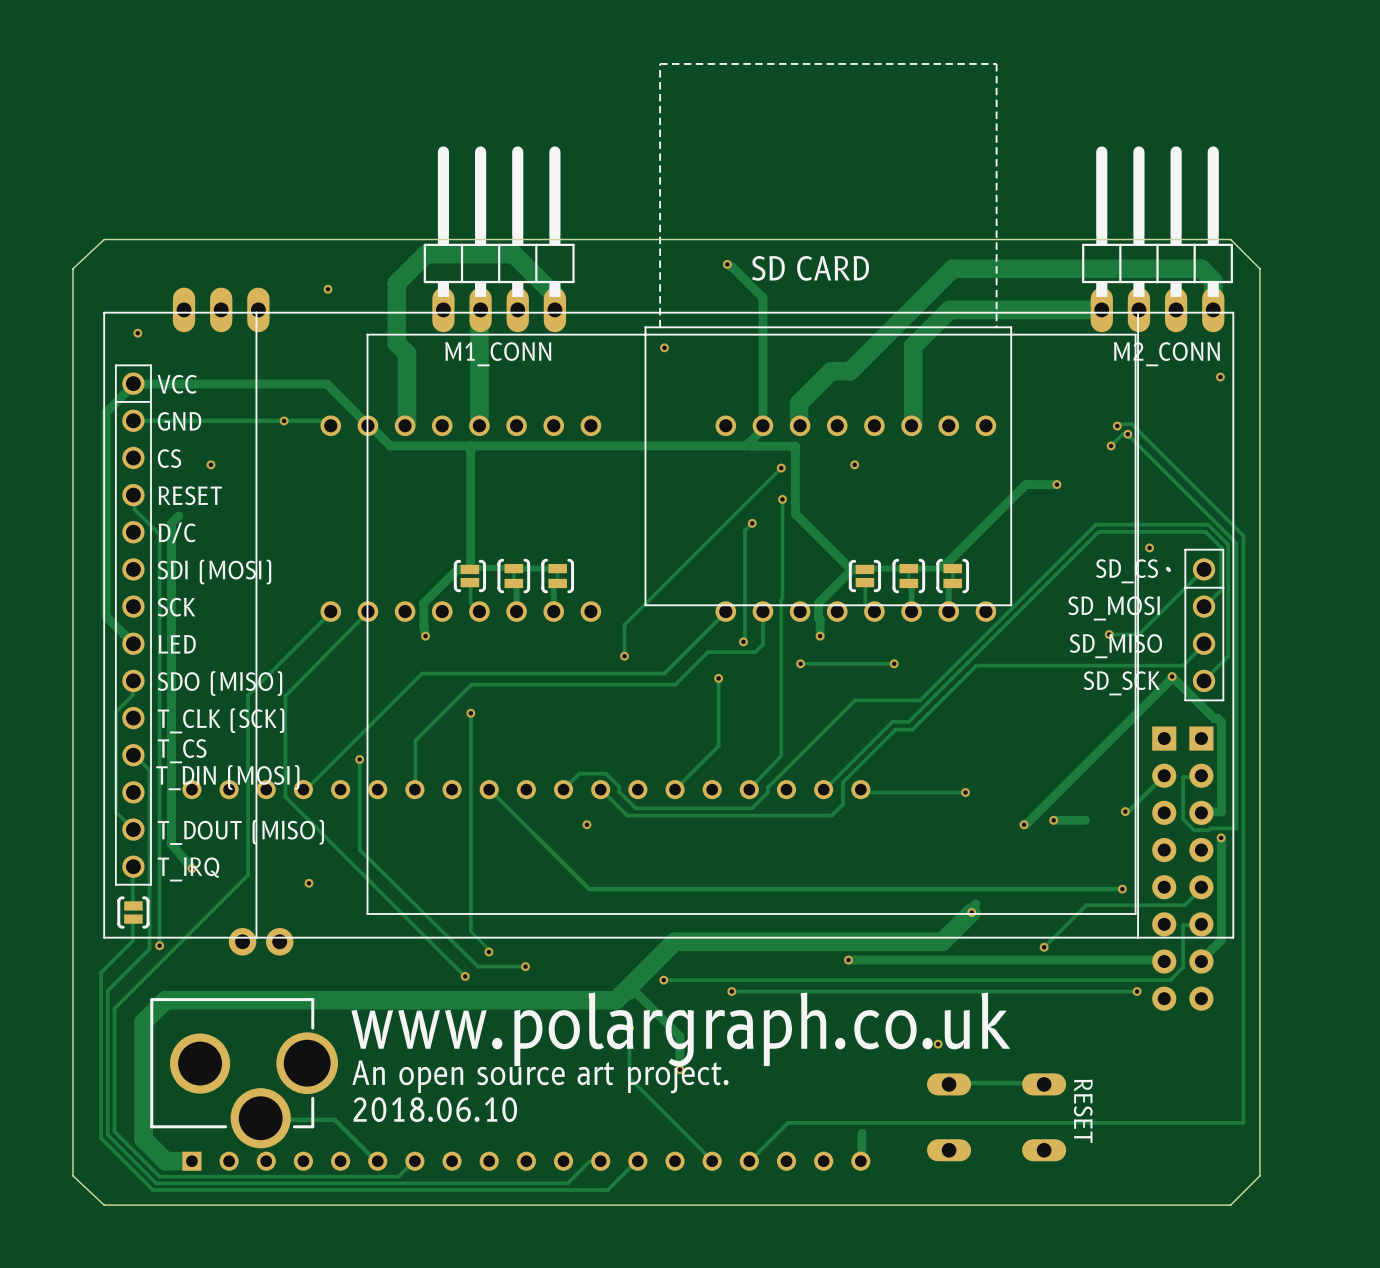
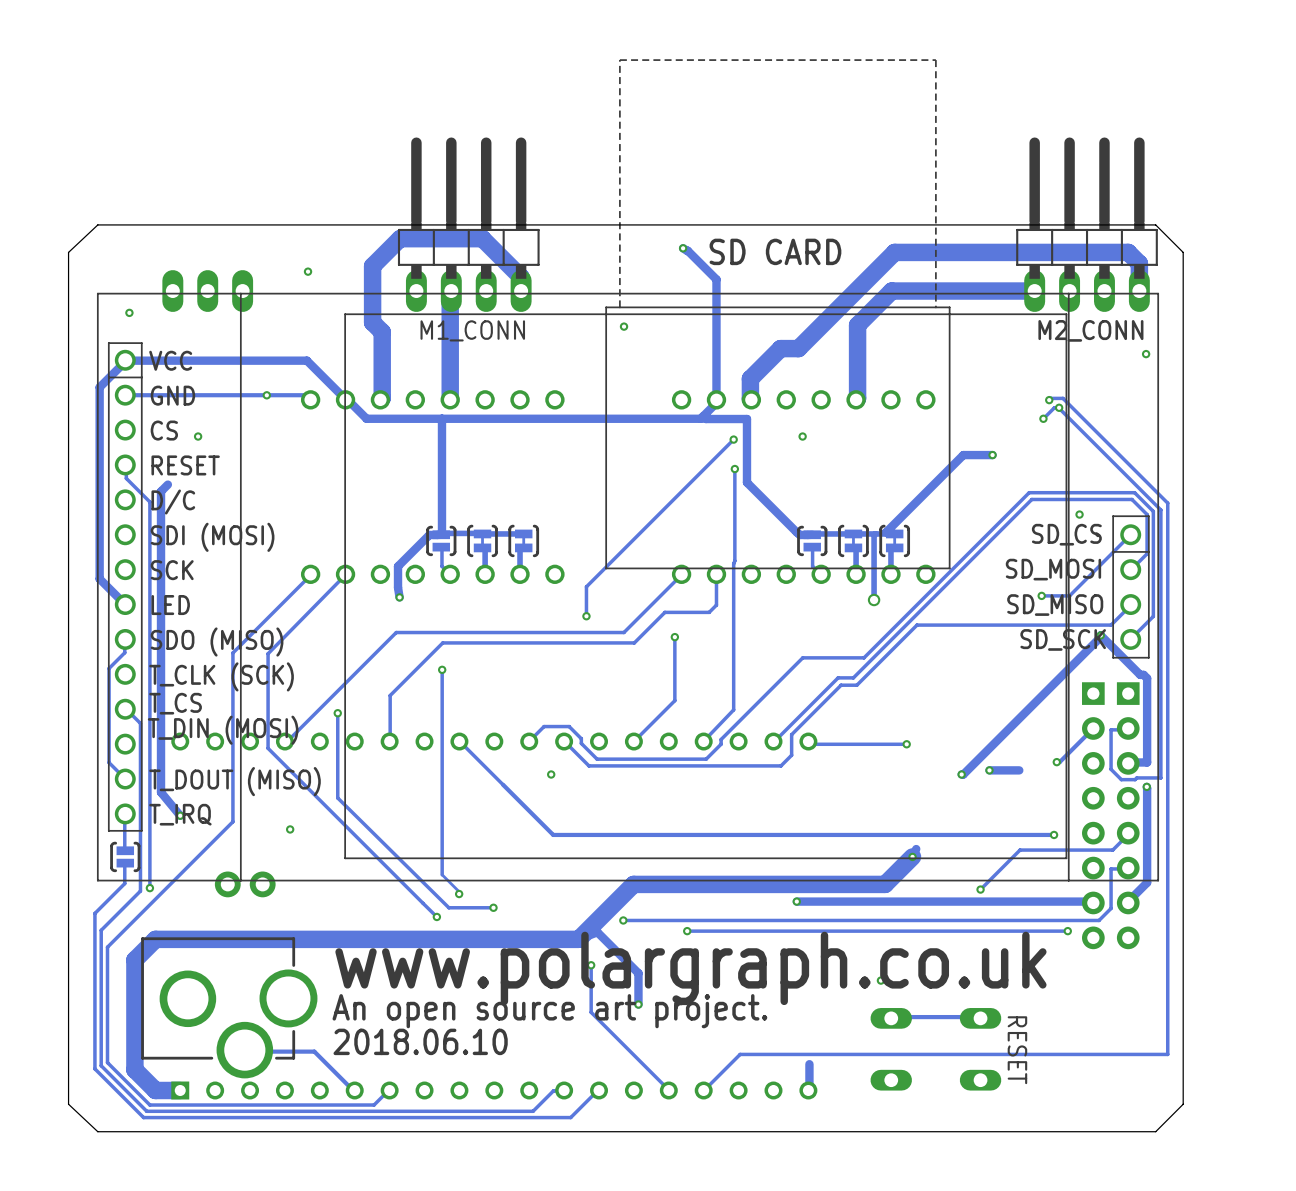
track: (752, 523) (744, 530) (743, 641) -> none
via: (752, 523) -> none
track: none -> (875, 533) (874, 600)
track: (851, 569) (818, 603) (820, 636) -> none
via: (820, 636) -> none
via: none -> (874, 600)
via: (743, 641) -> none
via: (800, 663) -> none
track: (894, 663) (800, 663) -> none
via: (894, 663) -> none

